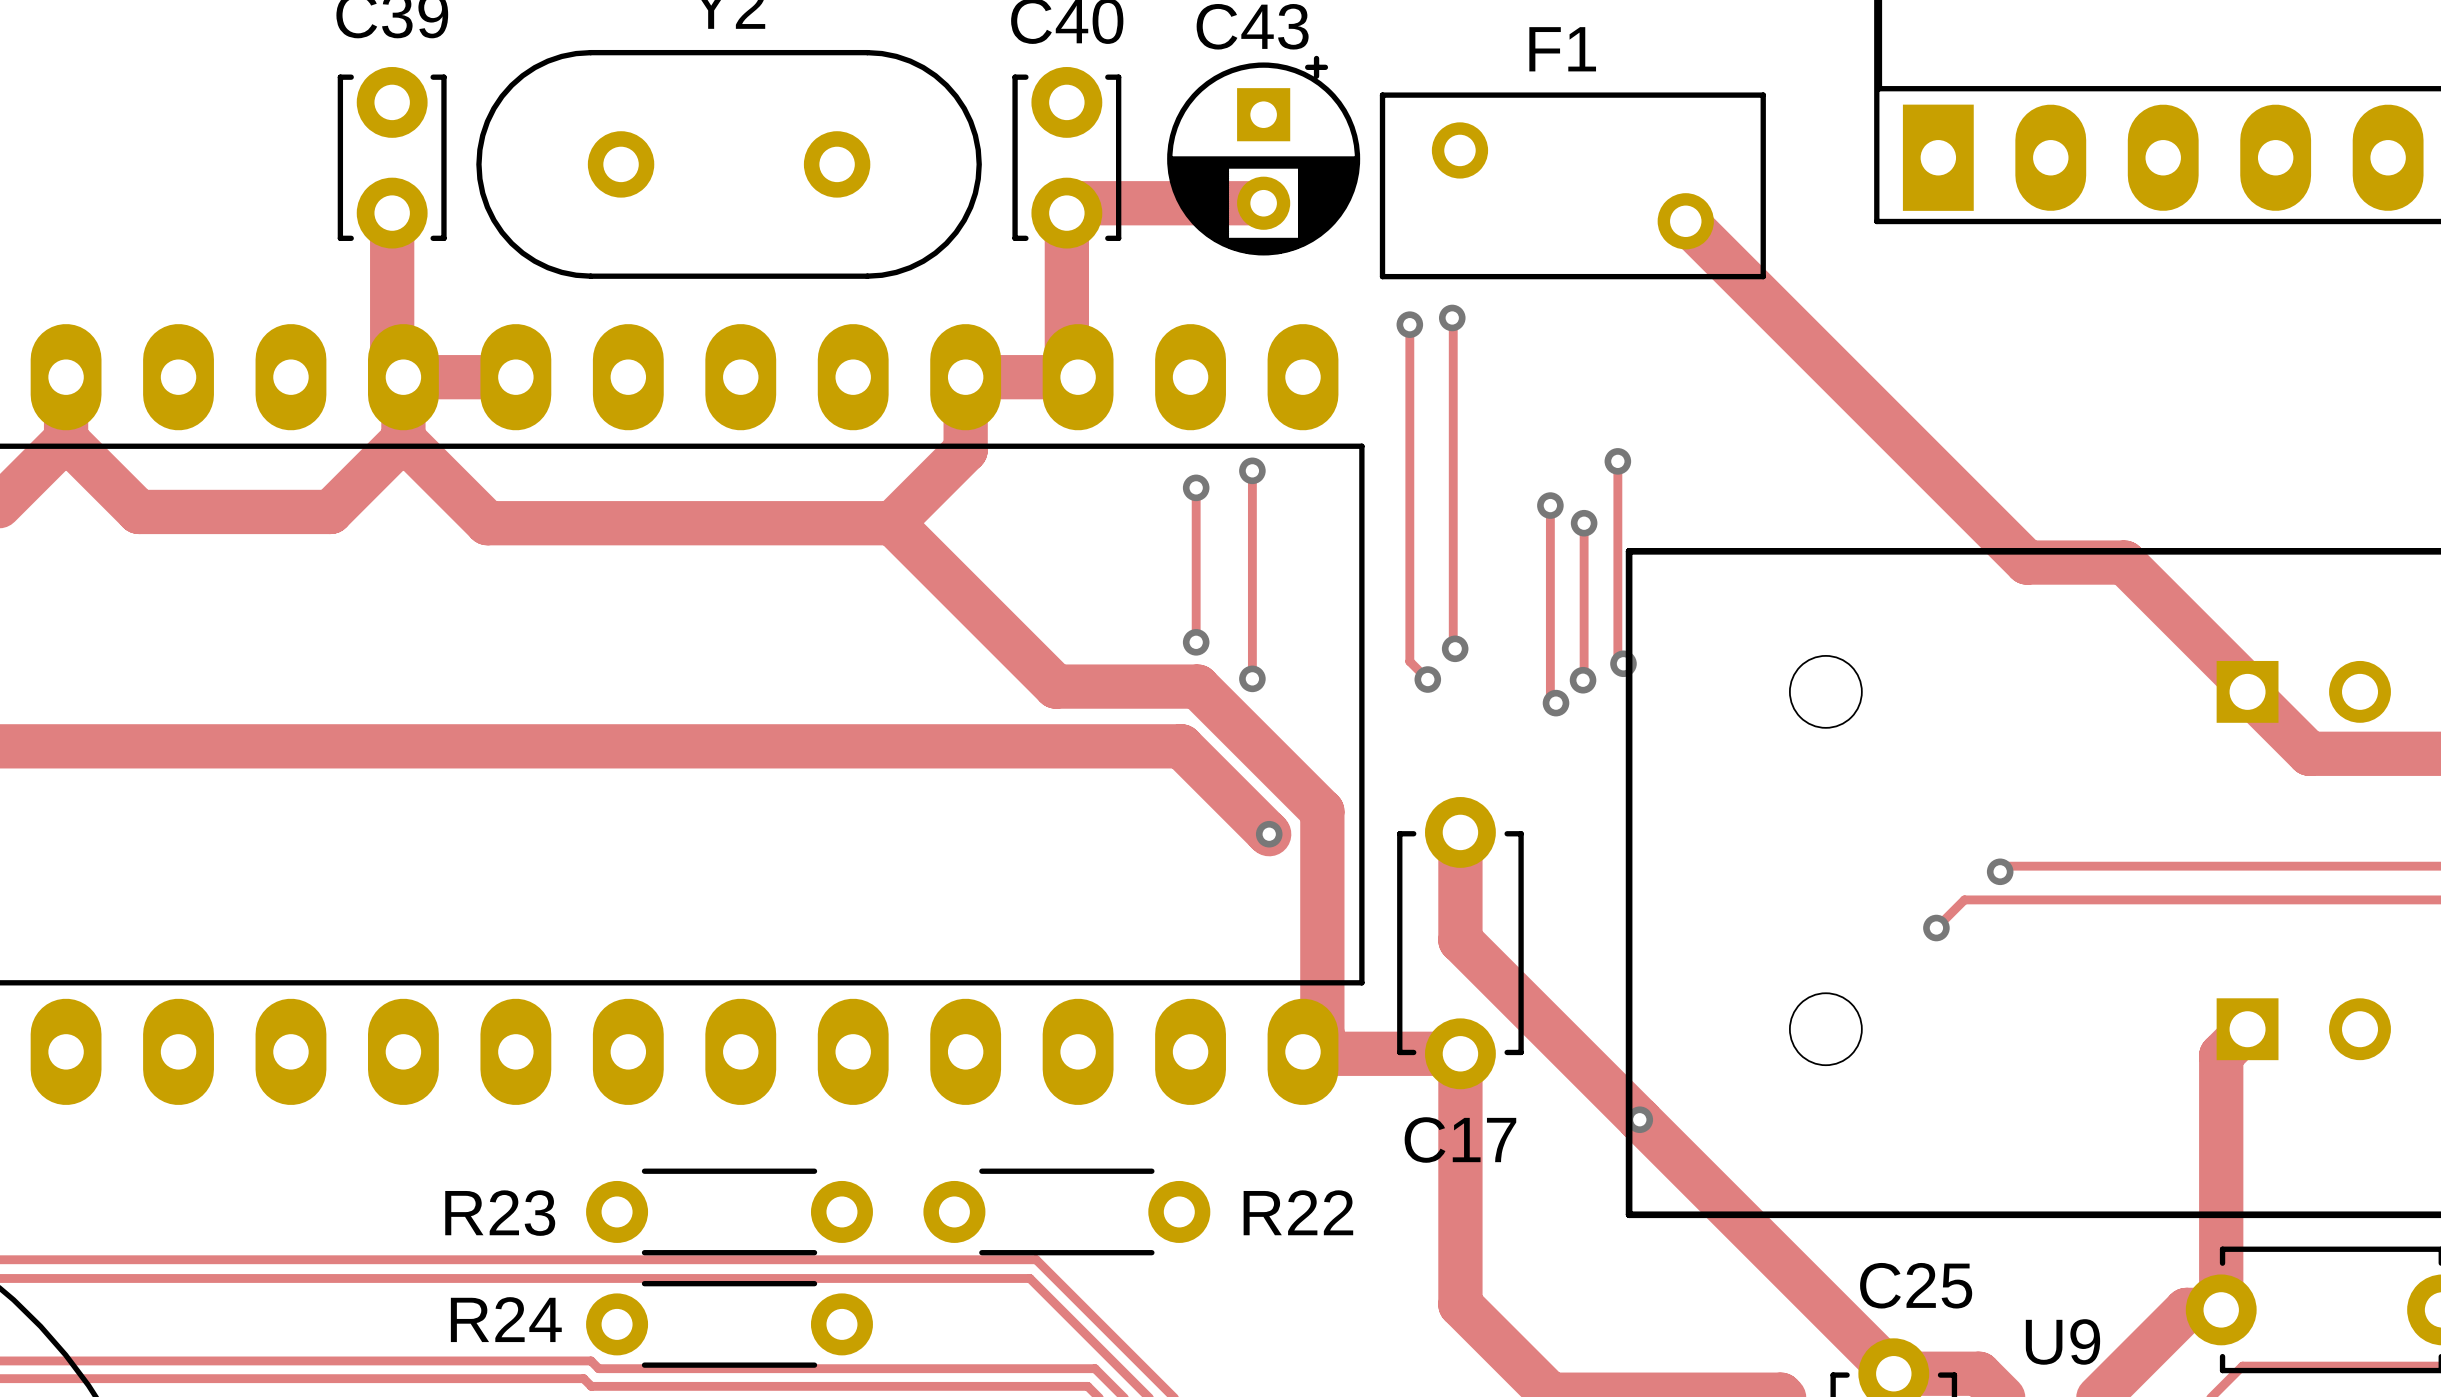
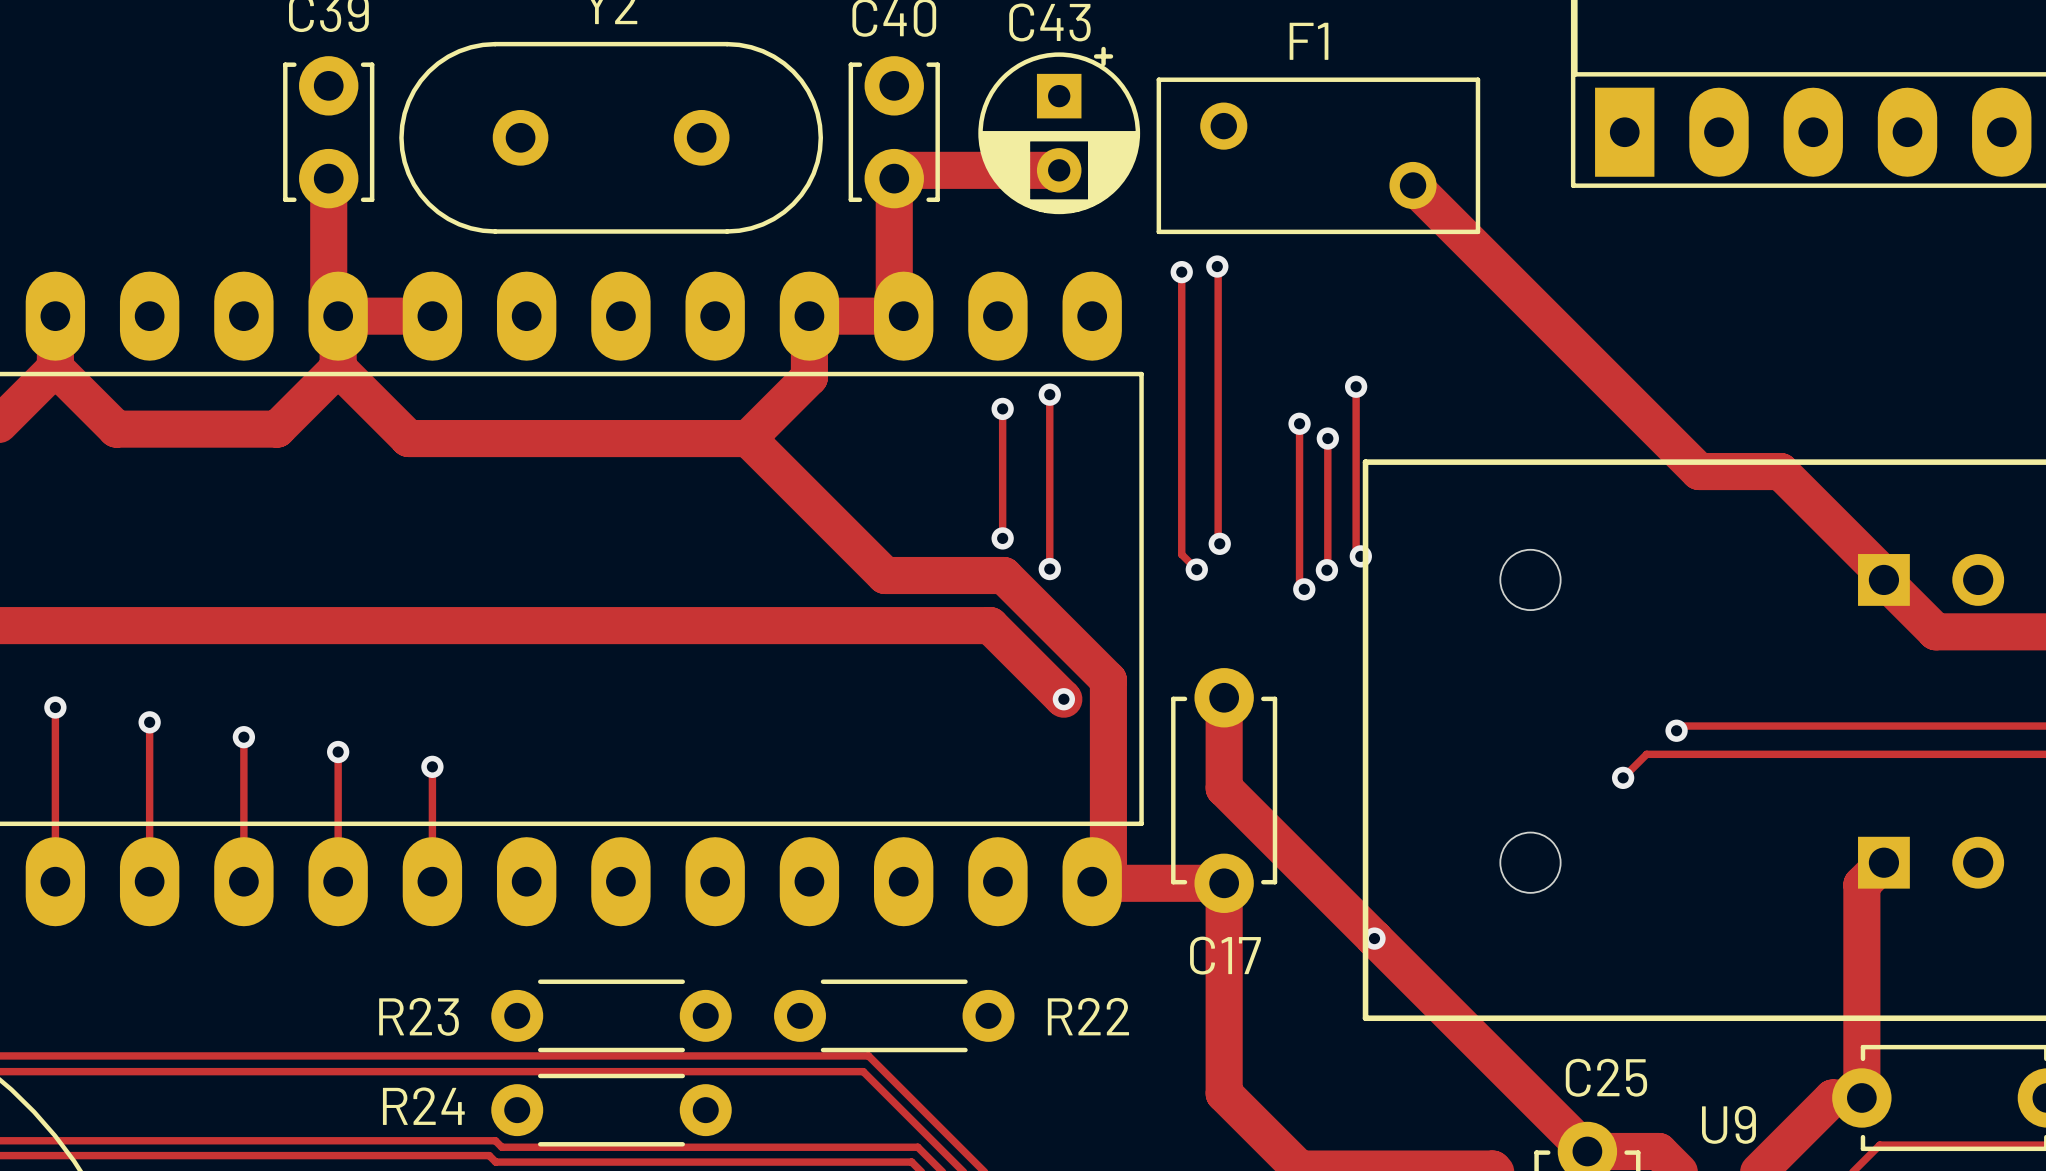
track: none -> (55, 707) (55, 881)
via: none -> (55, 707)
track: none -> (149, 722) (149, 881)
via: none -> (149, 722)
track: none -> (243, 737) (243, 881)
via: none -> (243, 737)
track: none -> (338, 752) (338, 881)
via: none -> (338, 752)
track: none -> (432, 766) (432, 881)
via: none -> (432, 766)

